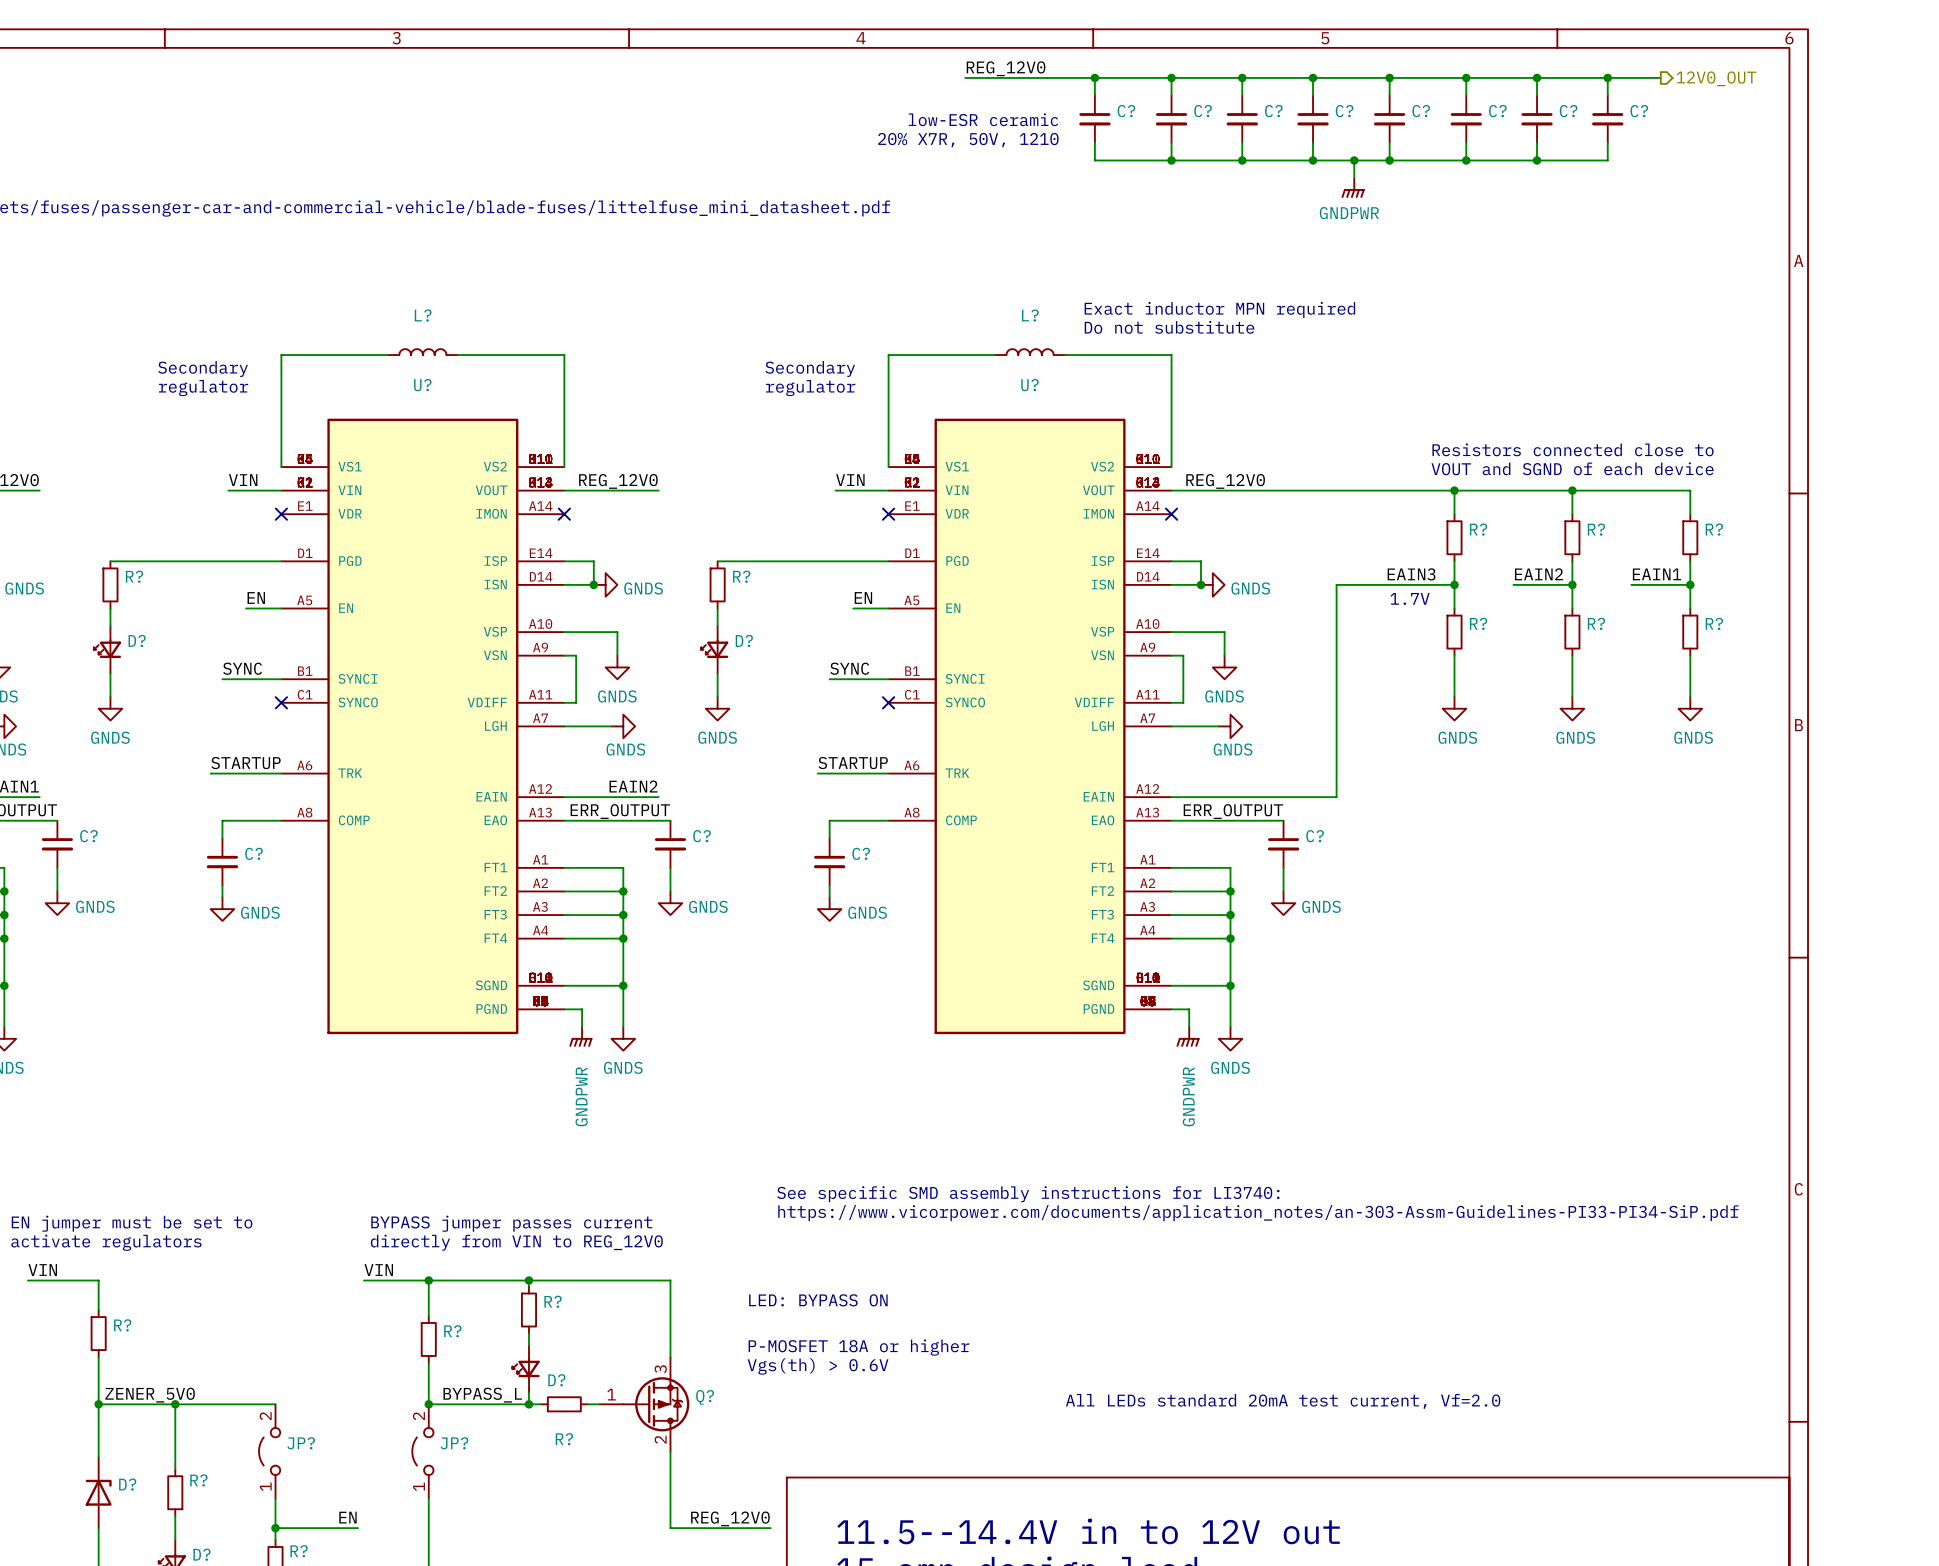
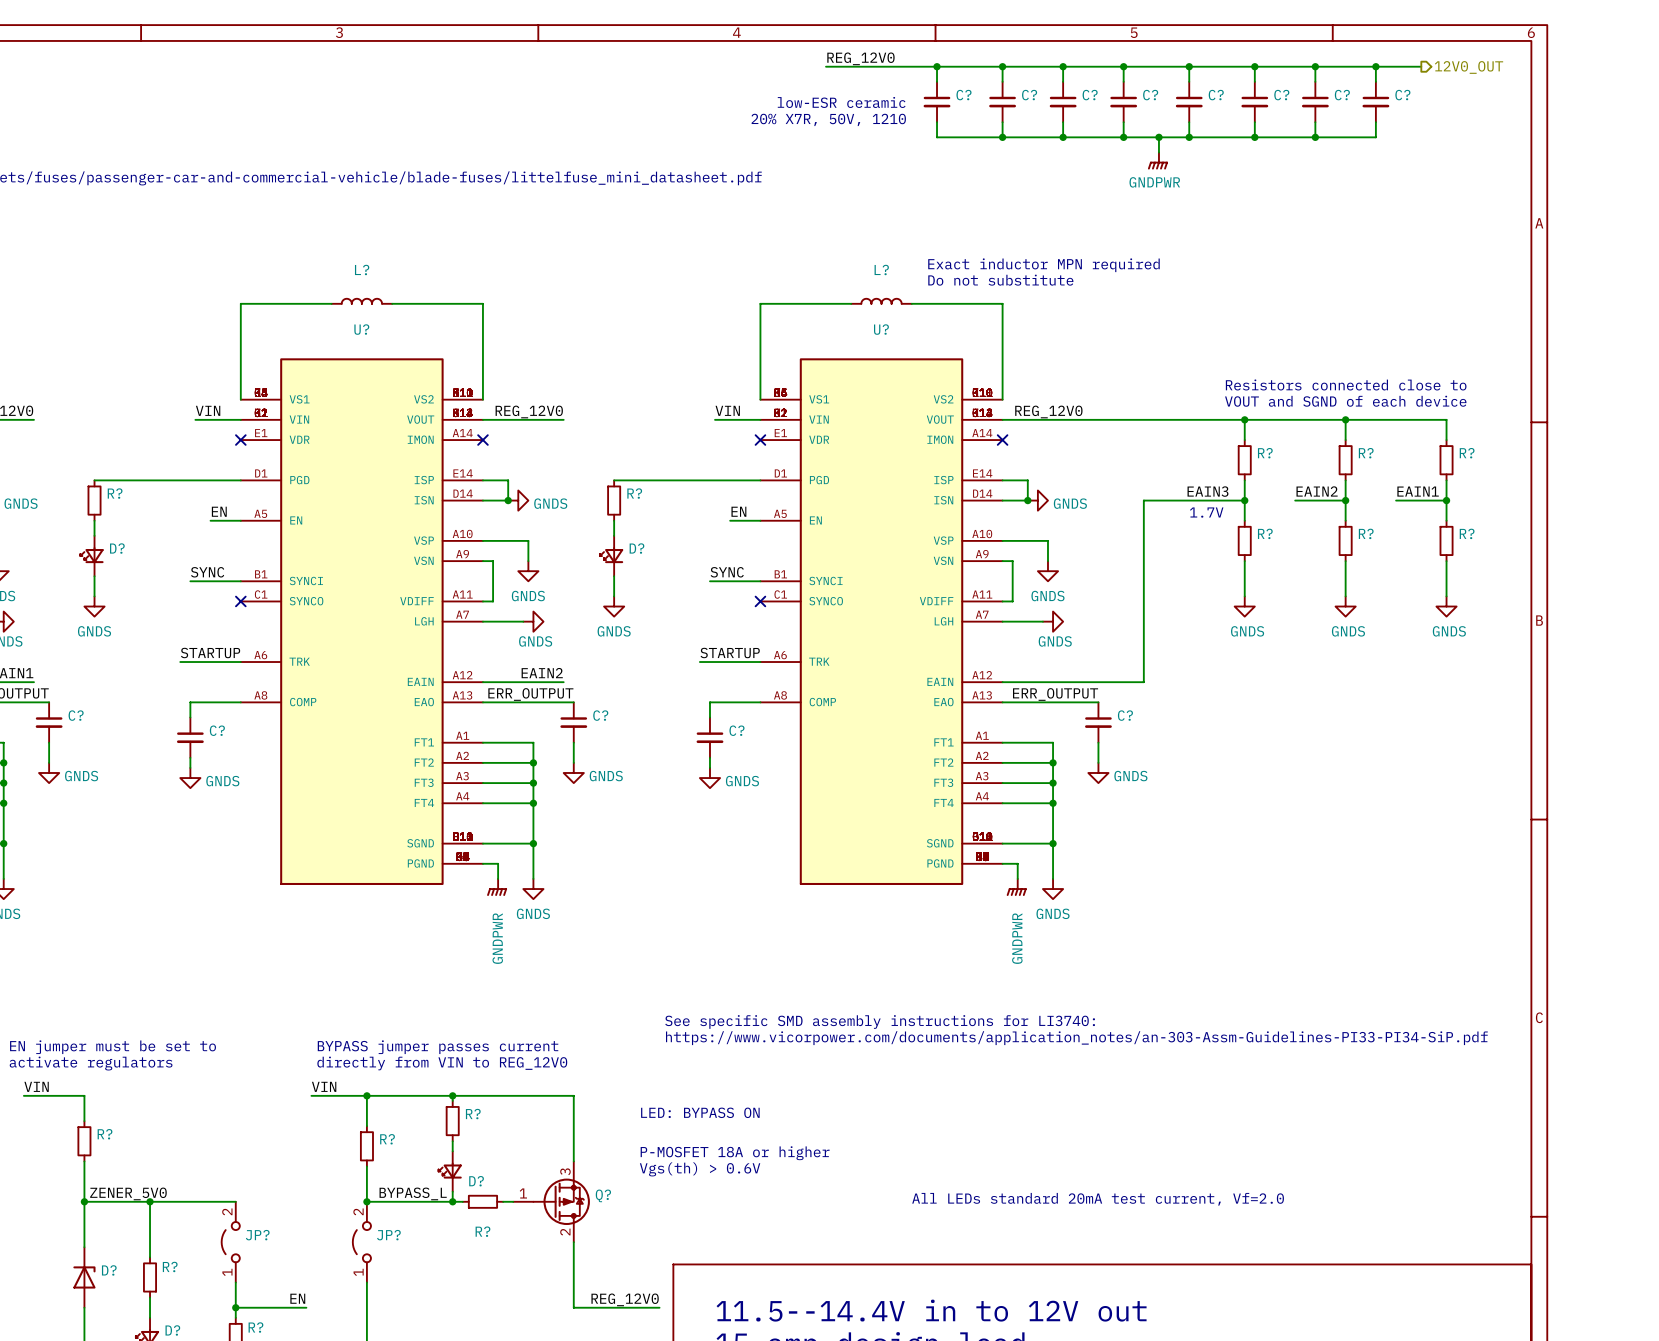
text: Secondary (203, 368) -> none
text: Secondary (810, 368) -> none
text: regulator (203, 388) -> none
text: regulator (810, 388) -> none

